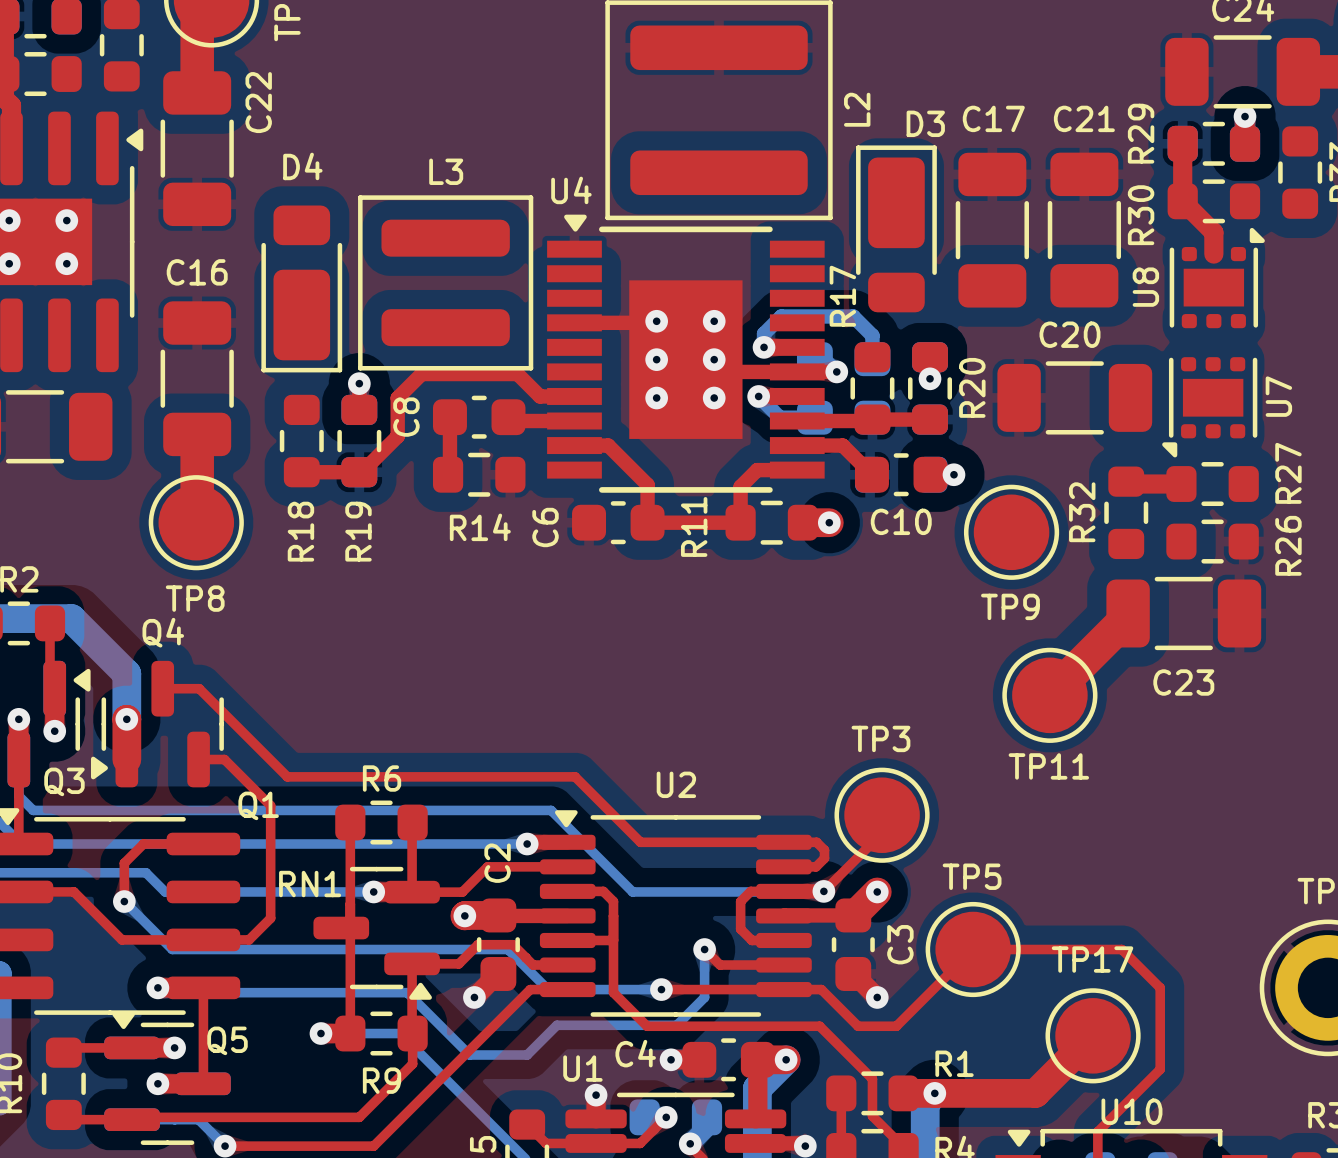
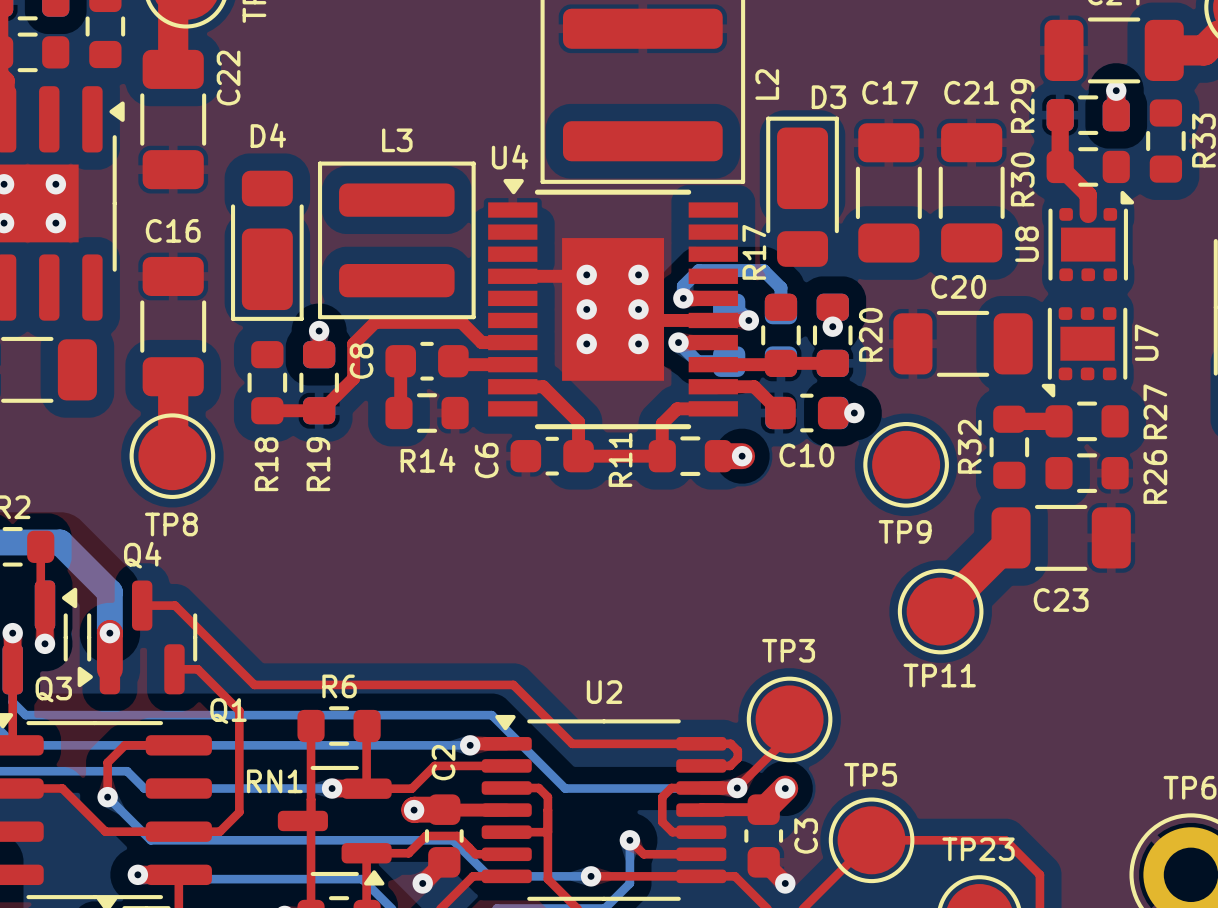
TP17 name: TP17 (1092, 959) -> TP23 (978, 849)

